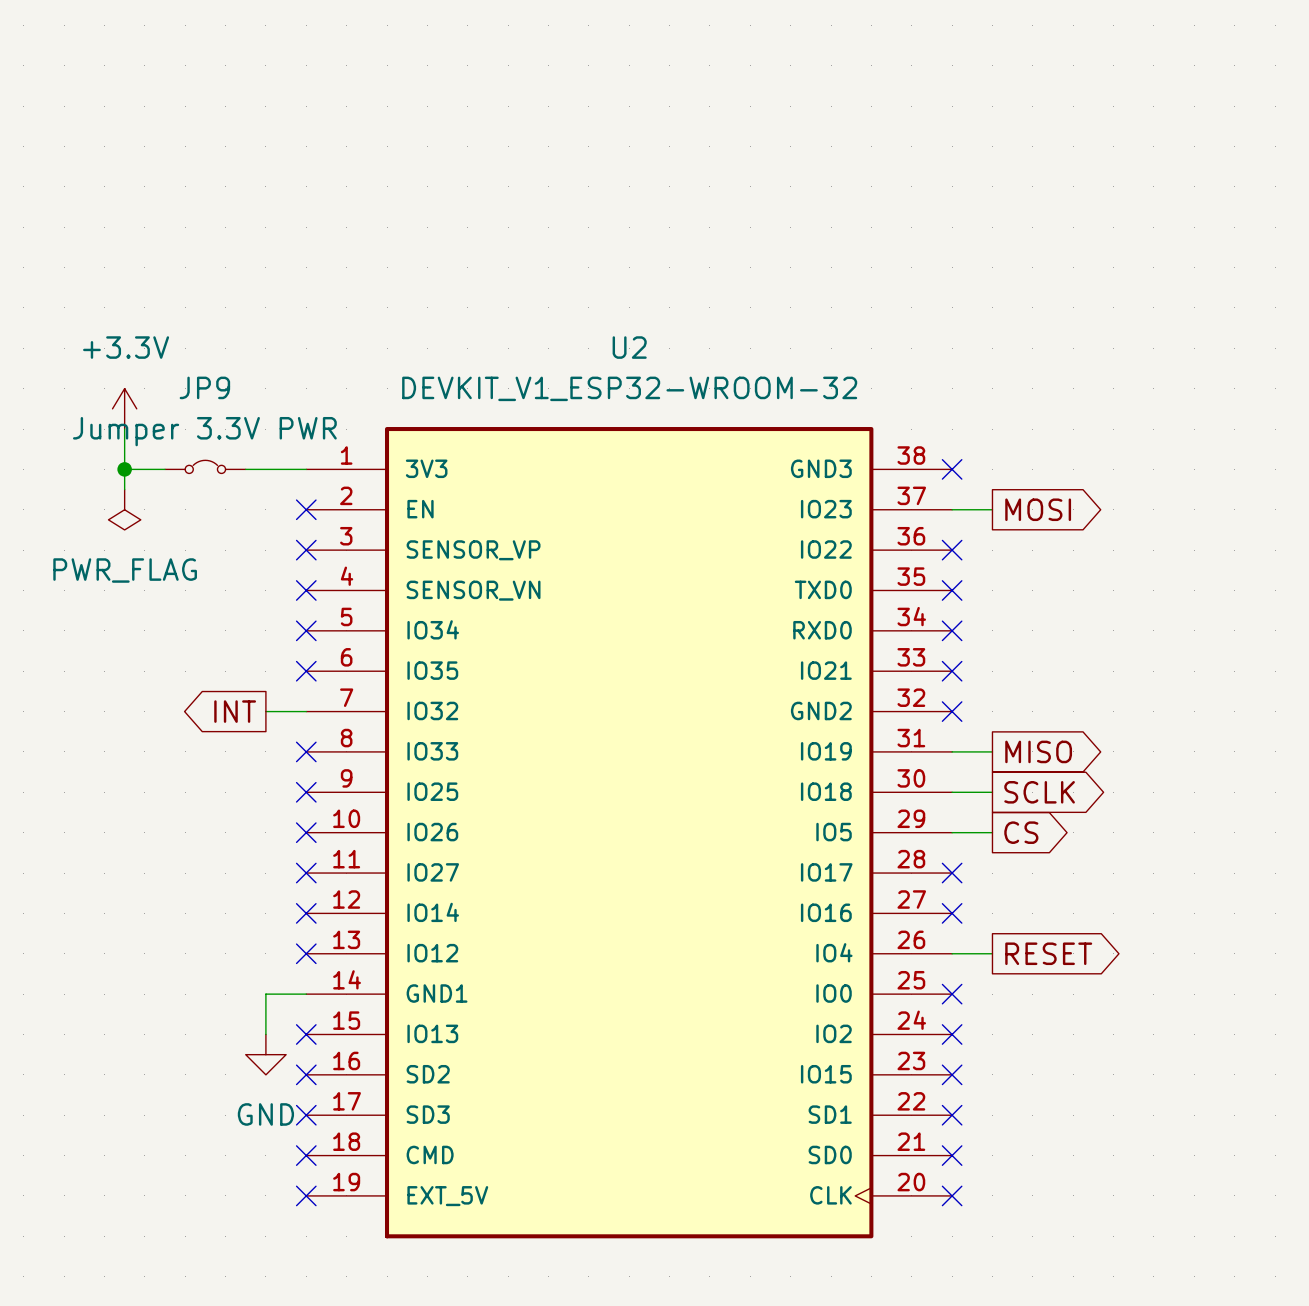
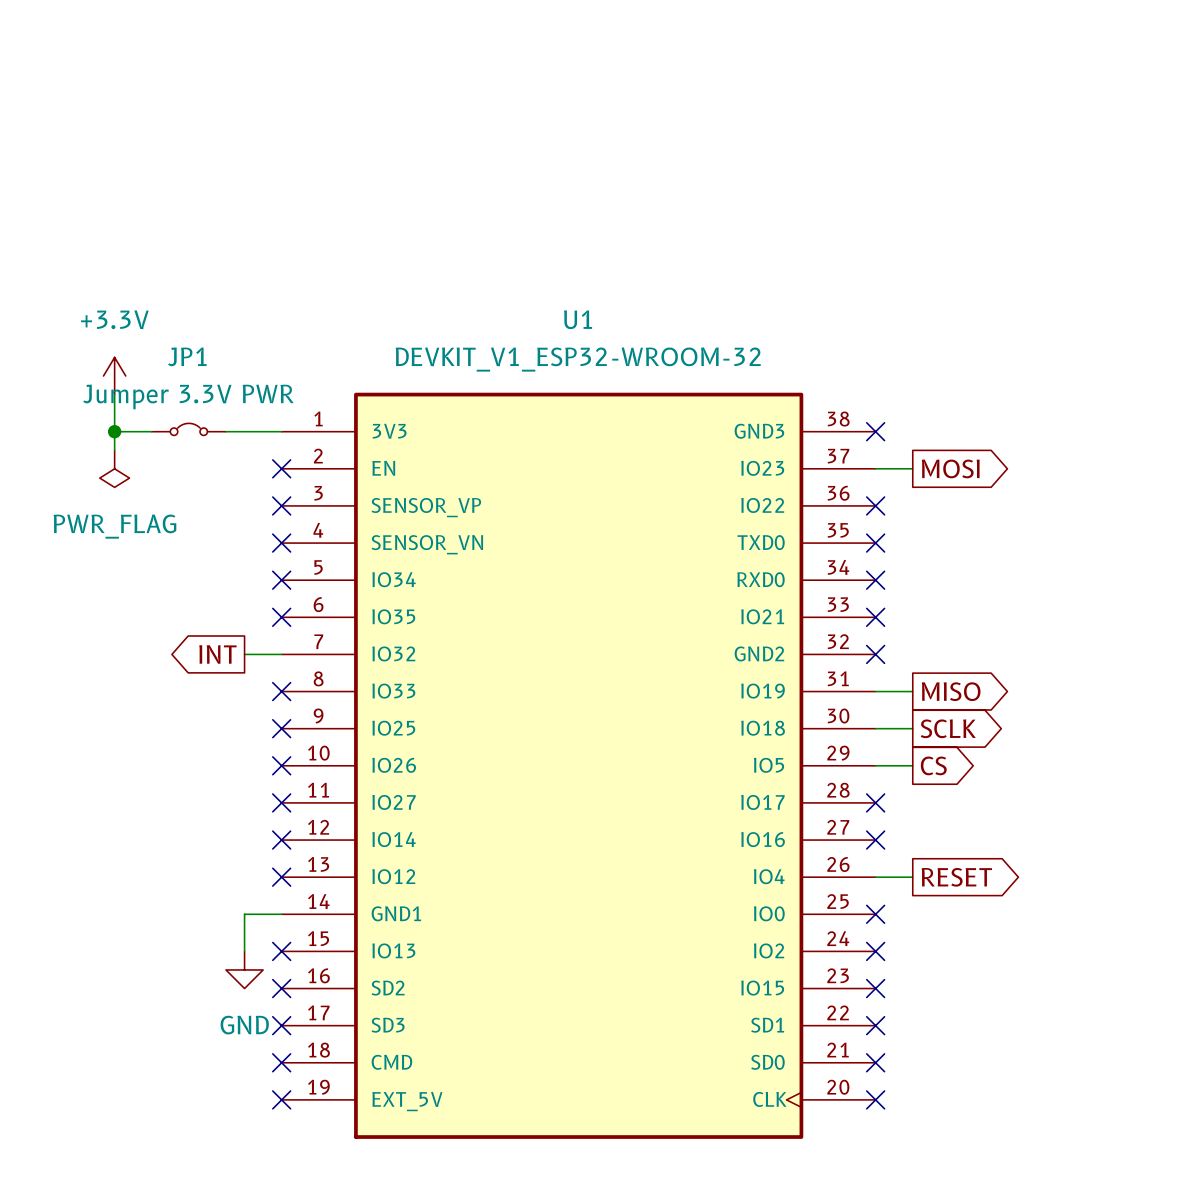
U2 name: U2 (629, 347) -> U1 (578, 319)
JP9 name: JP9 (204, 387) -> JP1 (187, 356)

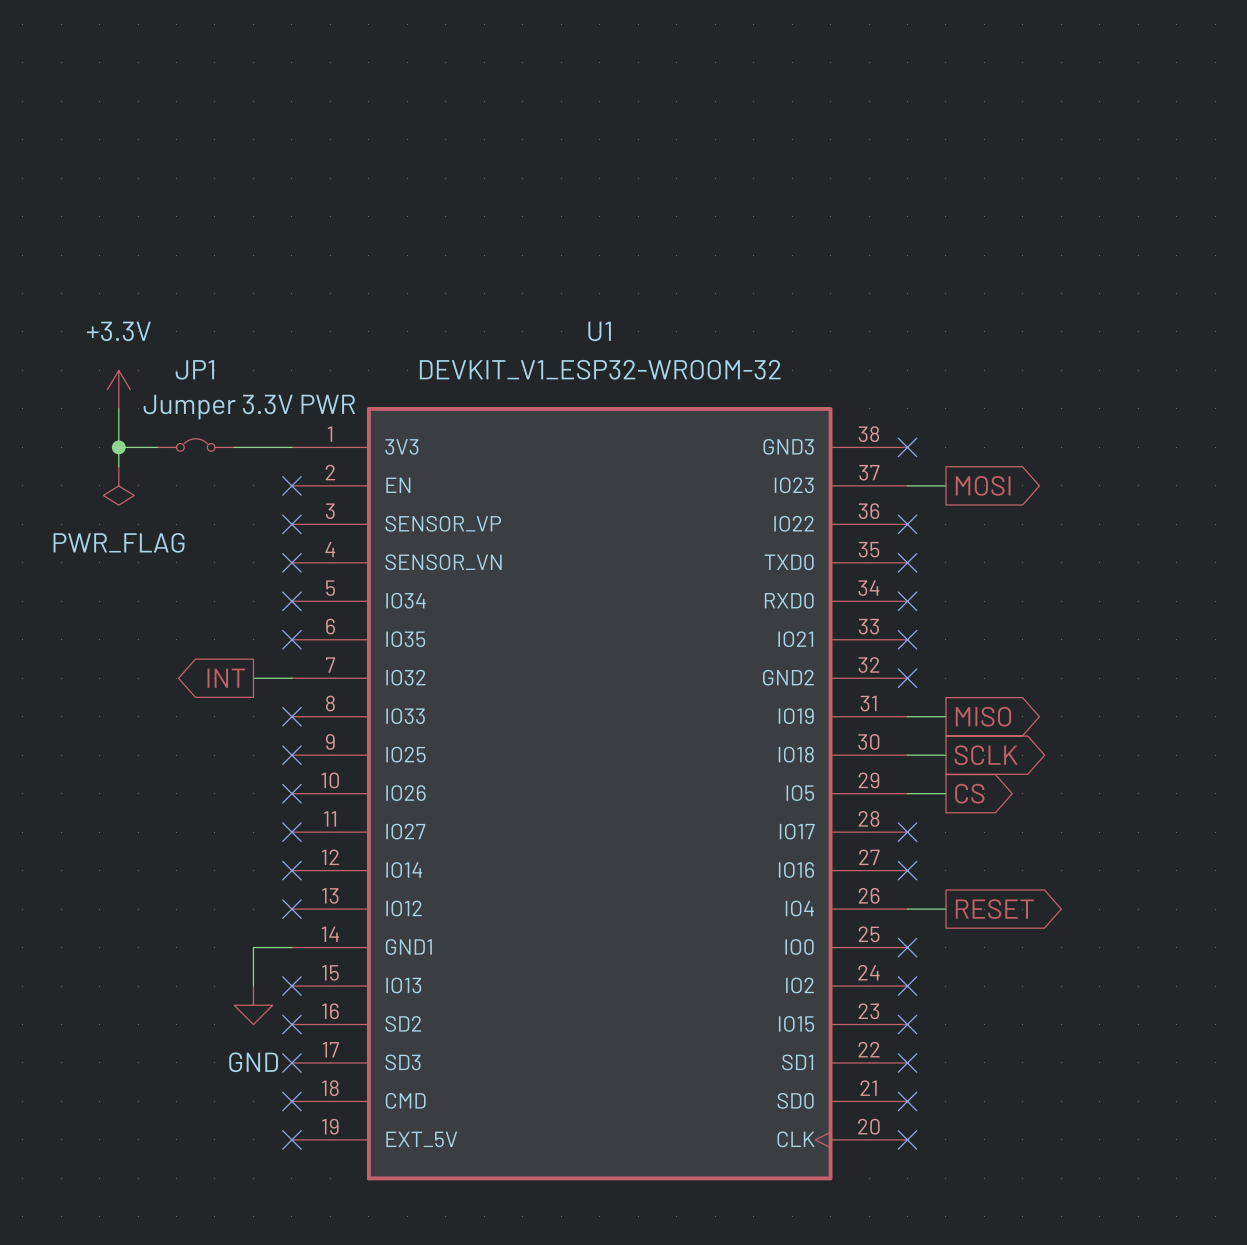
JP1 value position: Jumper 3.3V PWR (188, 396) -> Jumper 3.3V PWR (249, 407)

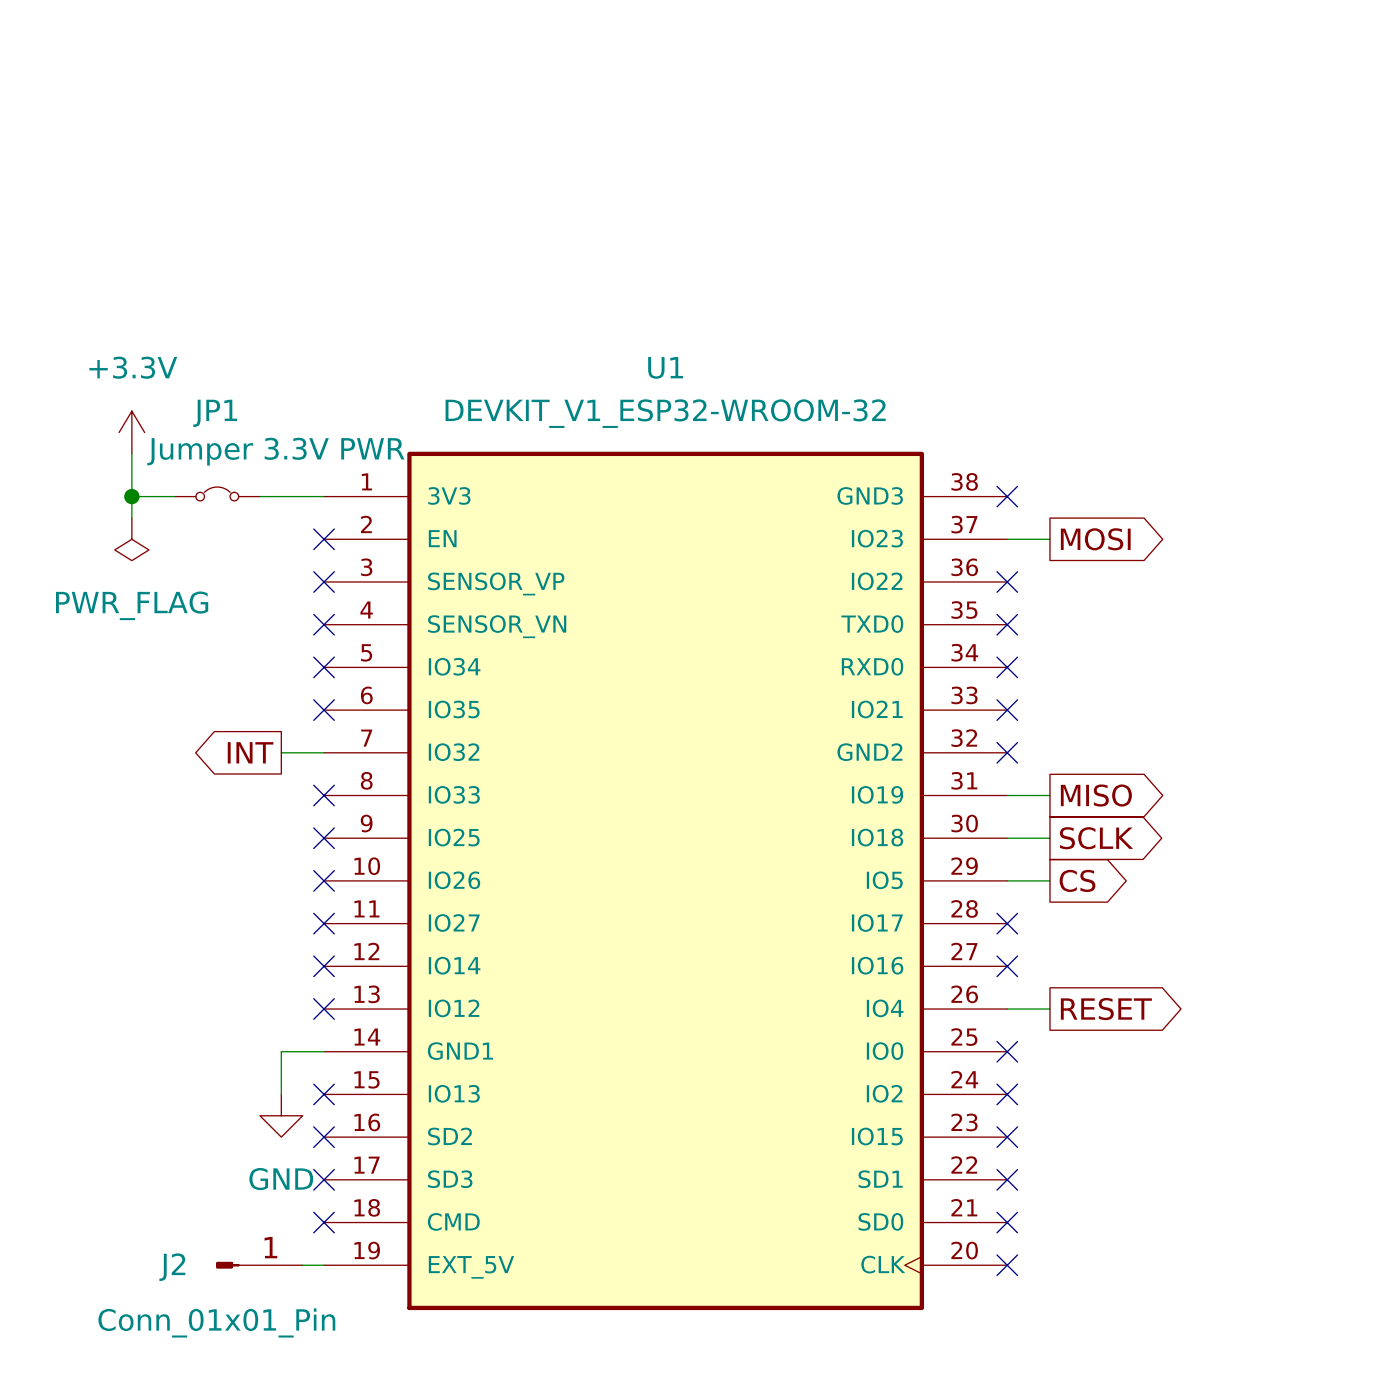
J2: none -> Conn_01x01_Pin (259, 1265)
wire: none -> (302, 1265) (324, 1265)
no-connect mark: (291, 1139) -> none

